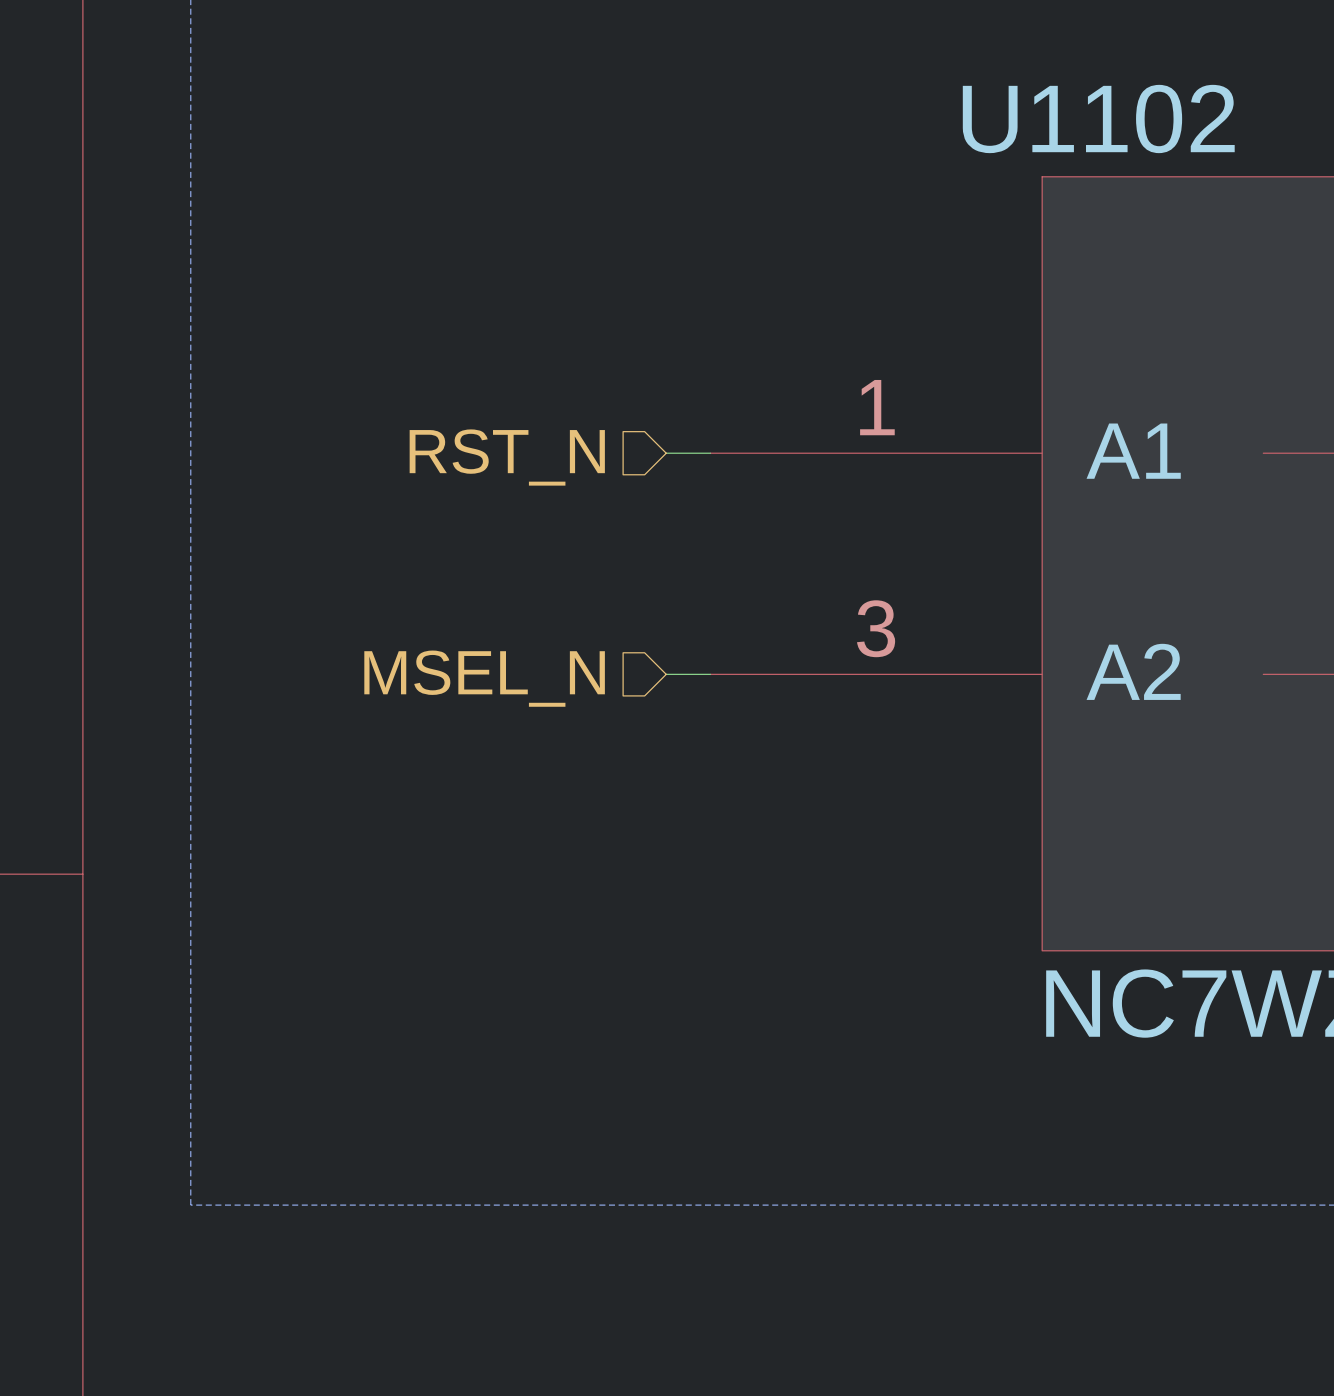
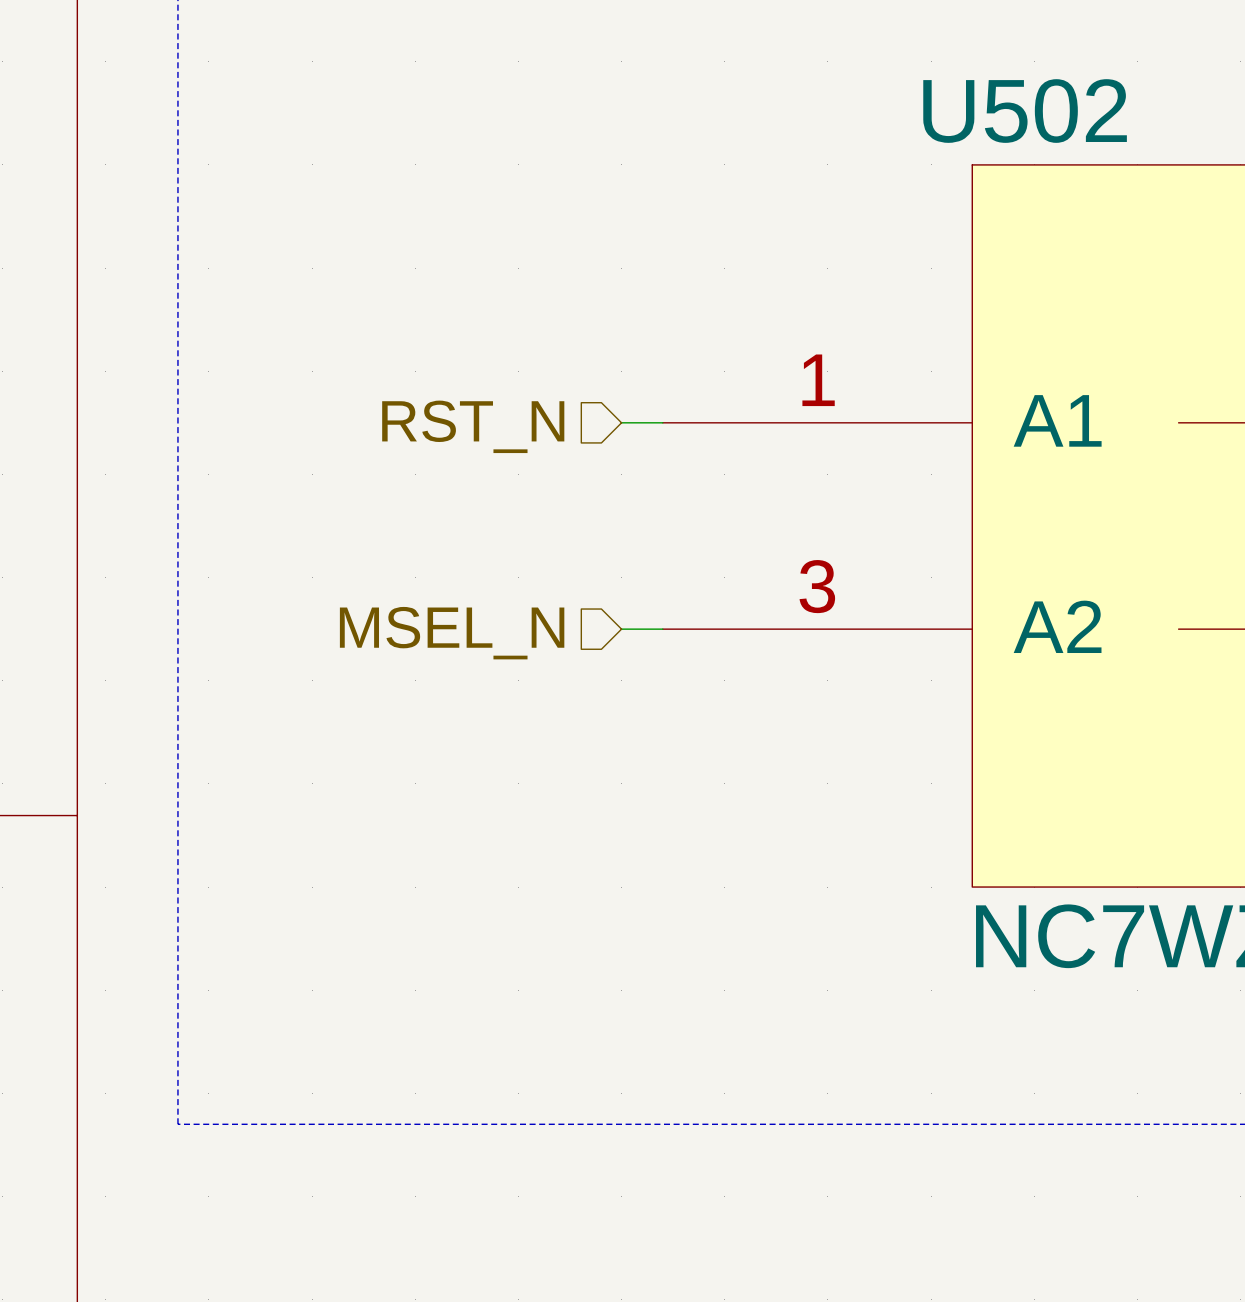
U1102 name: U1102 (1098, 119) -> U502 (1025, 111)

